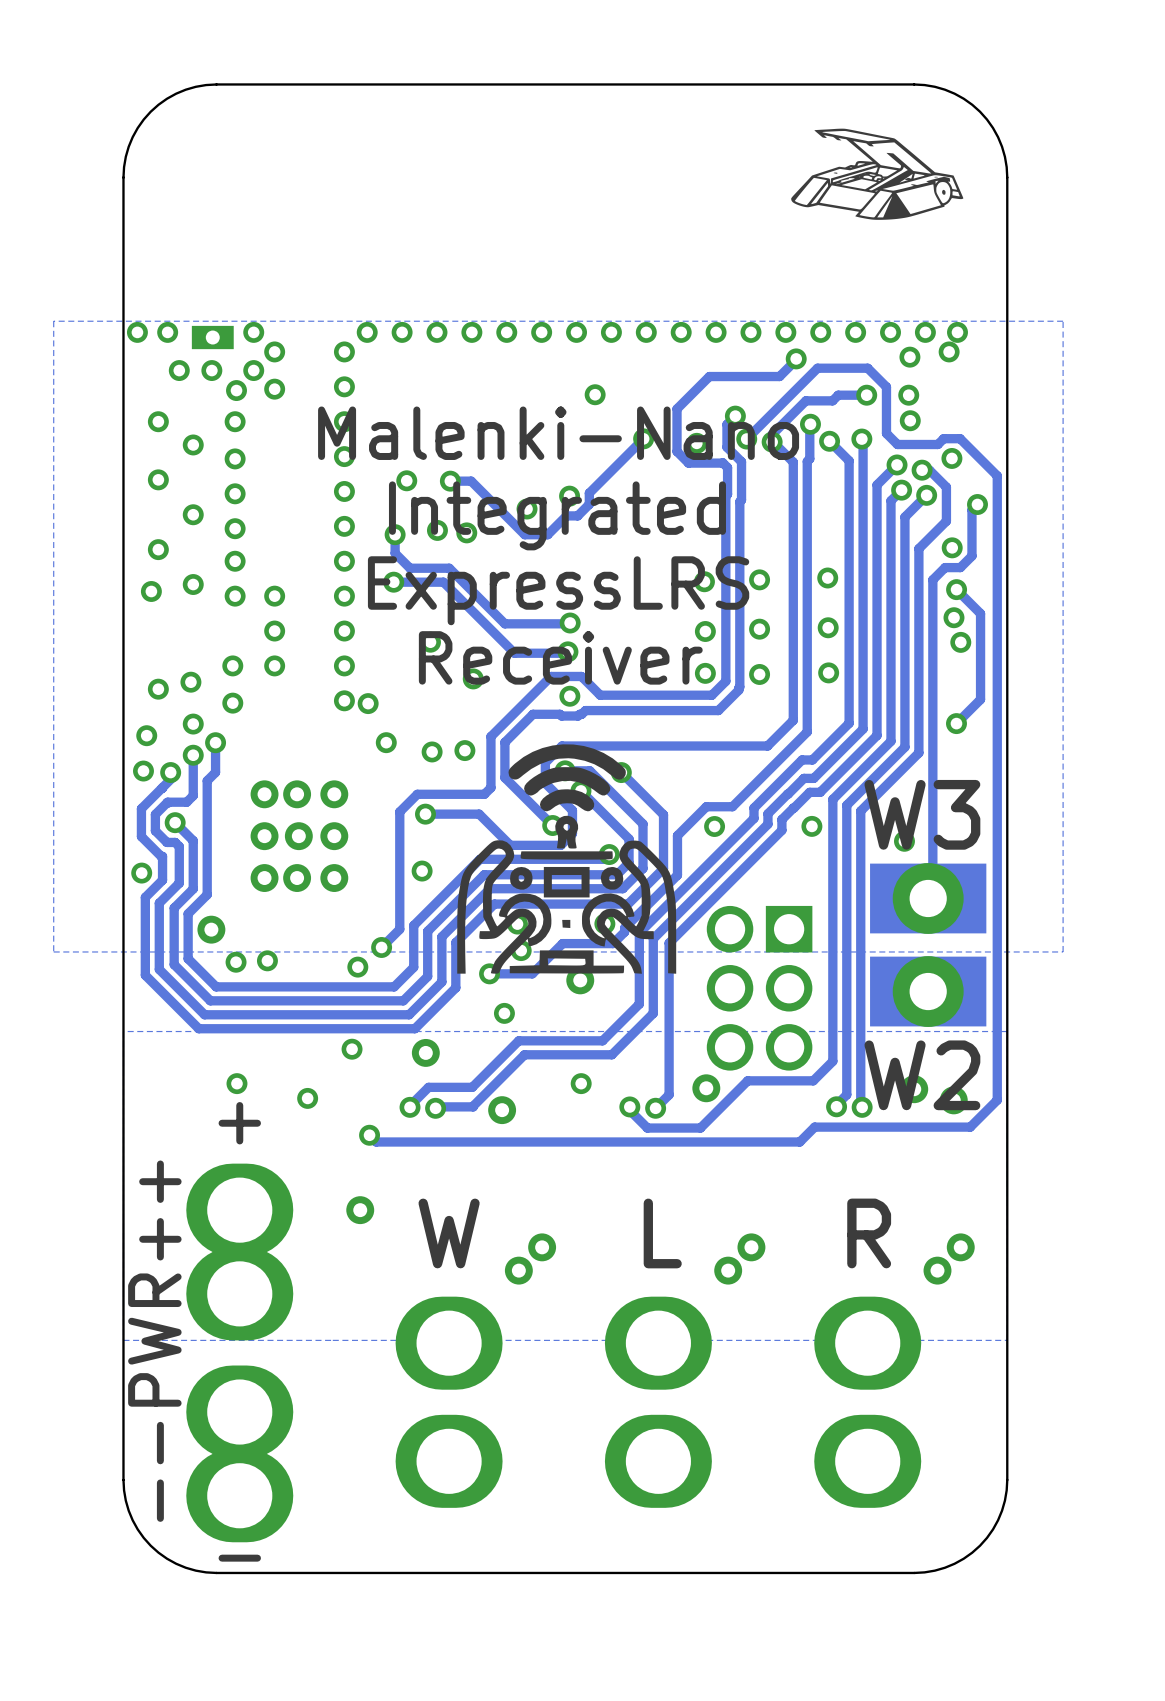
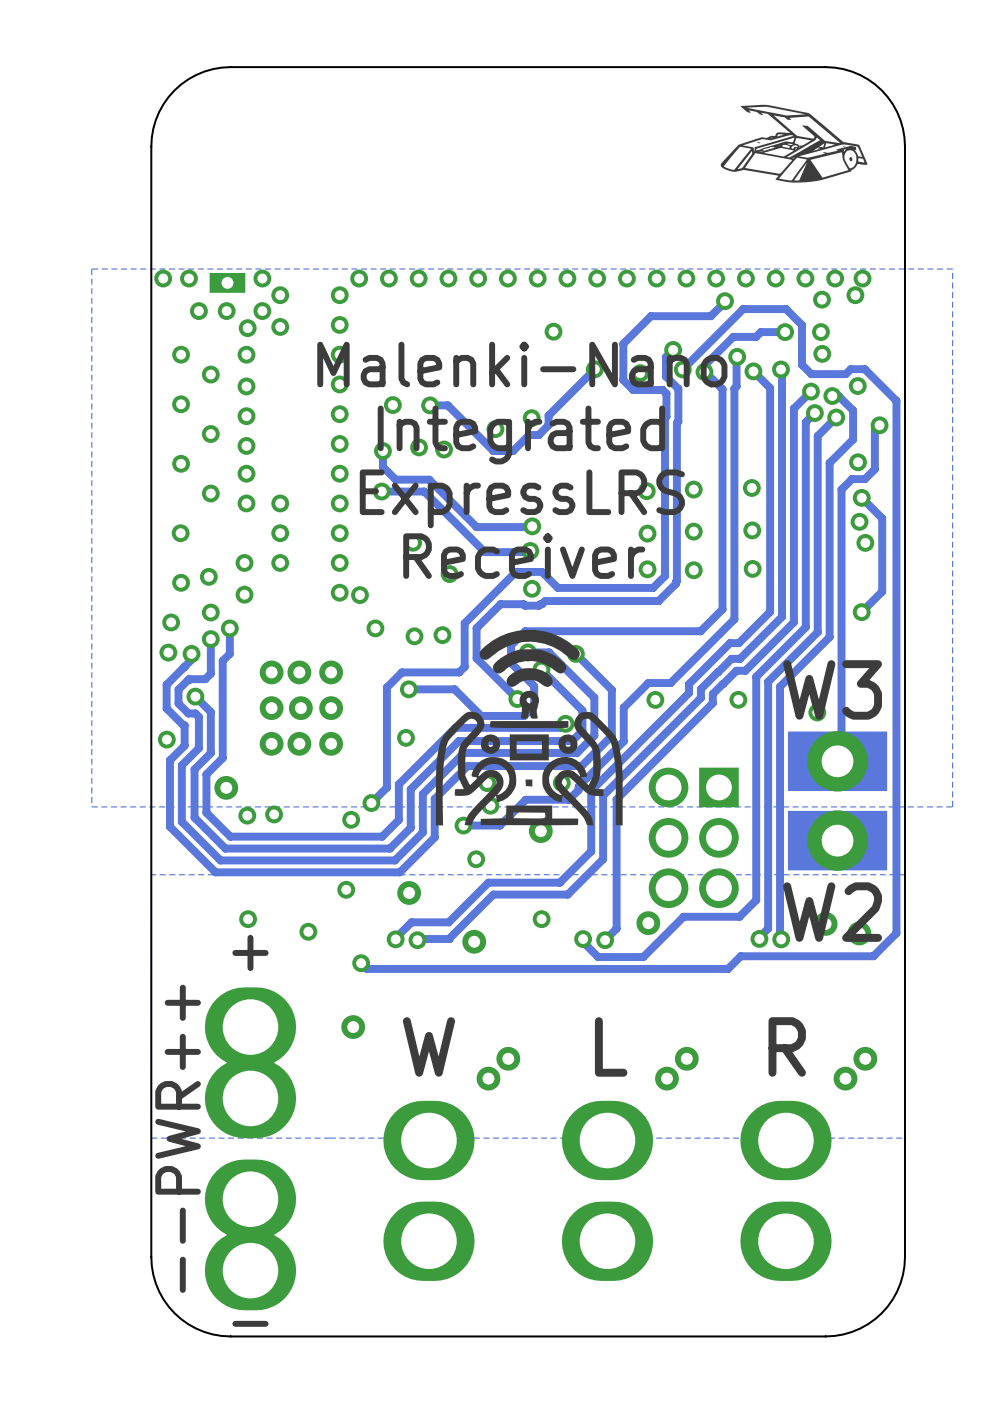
via position: (151, 591) -> (180, 533)

